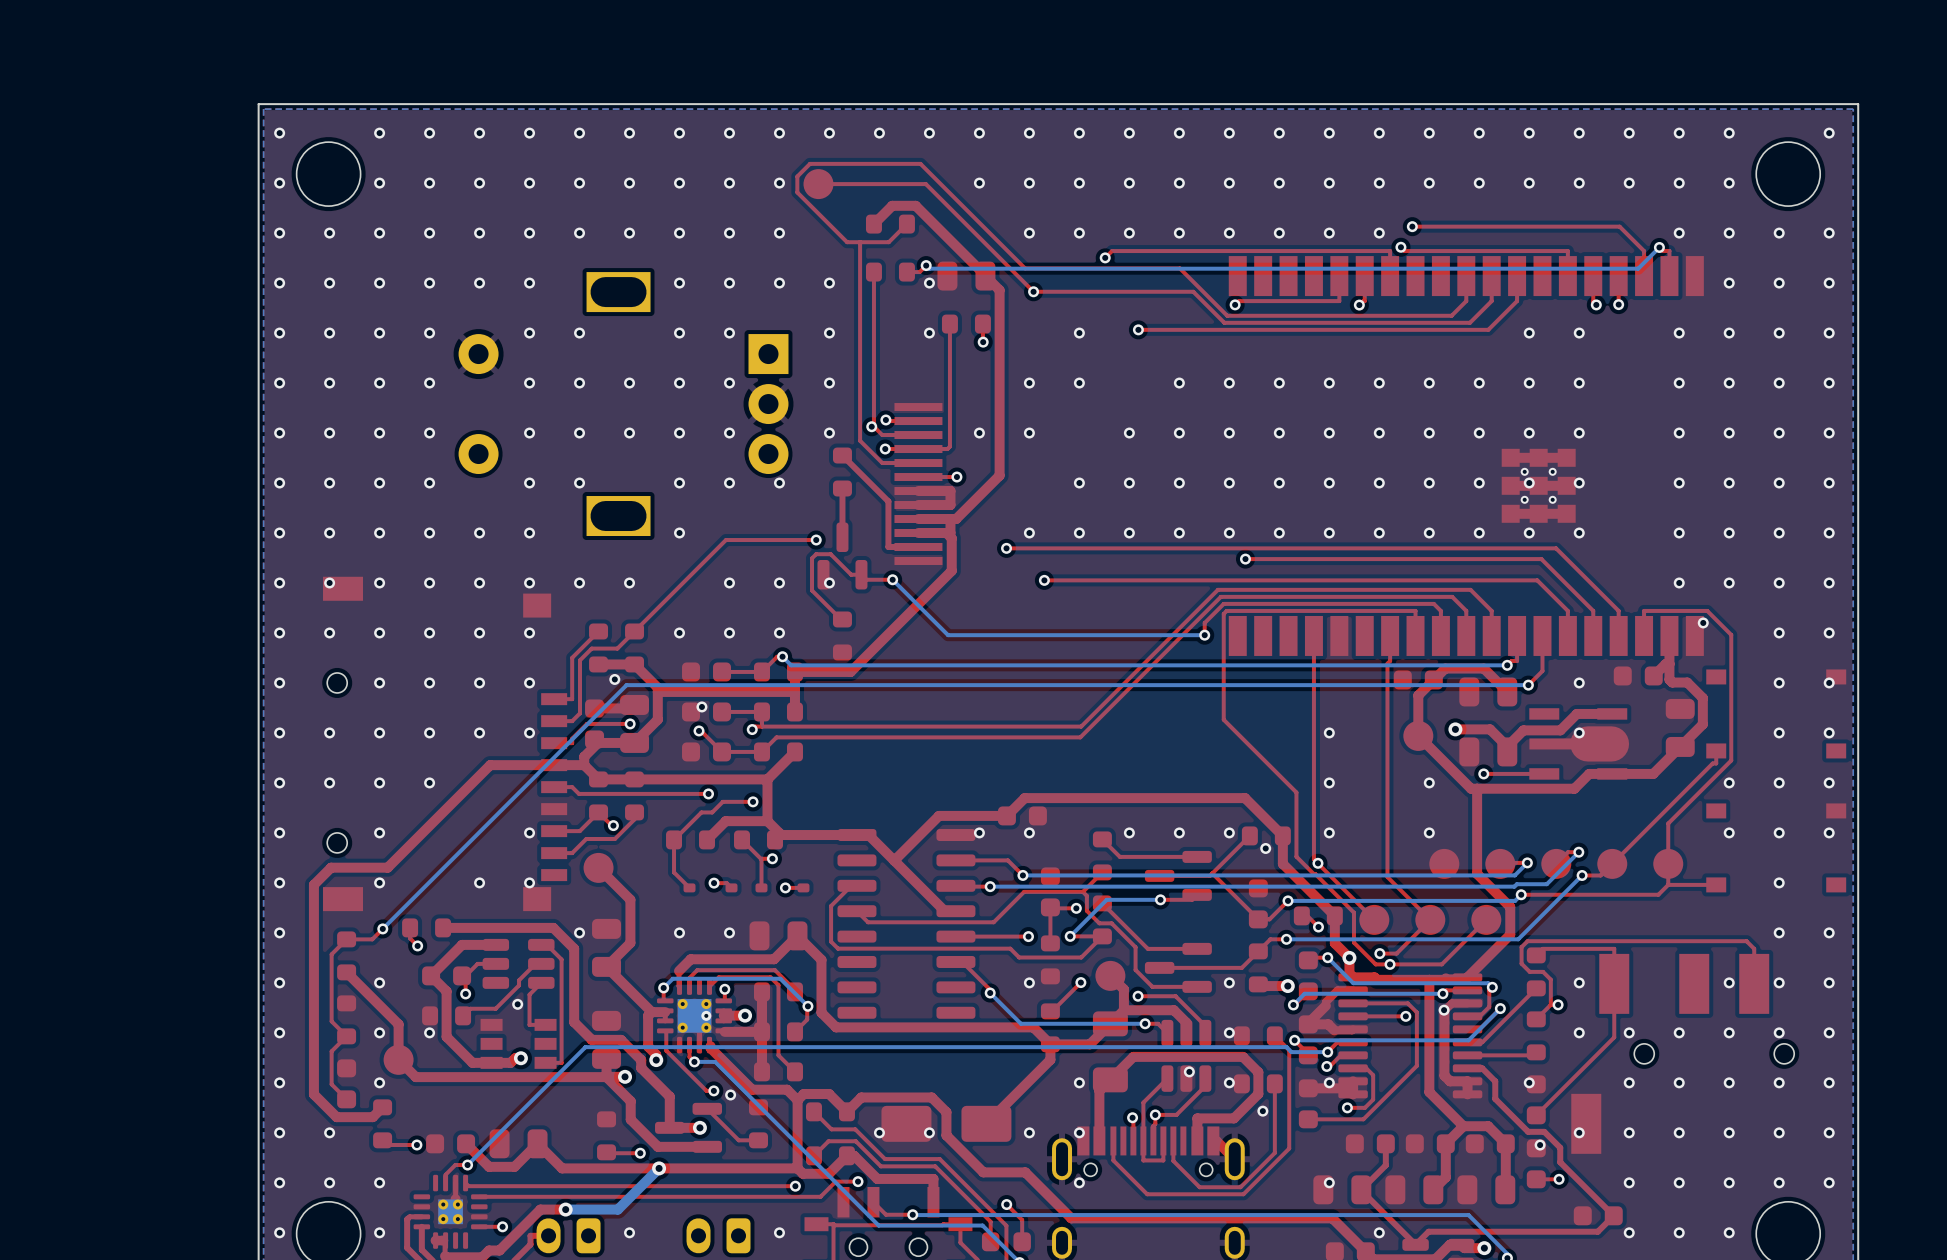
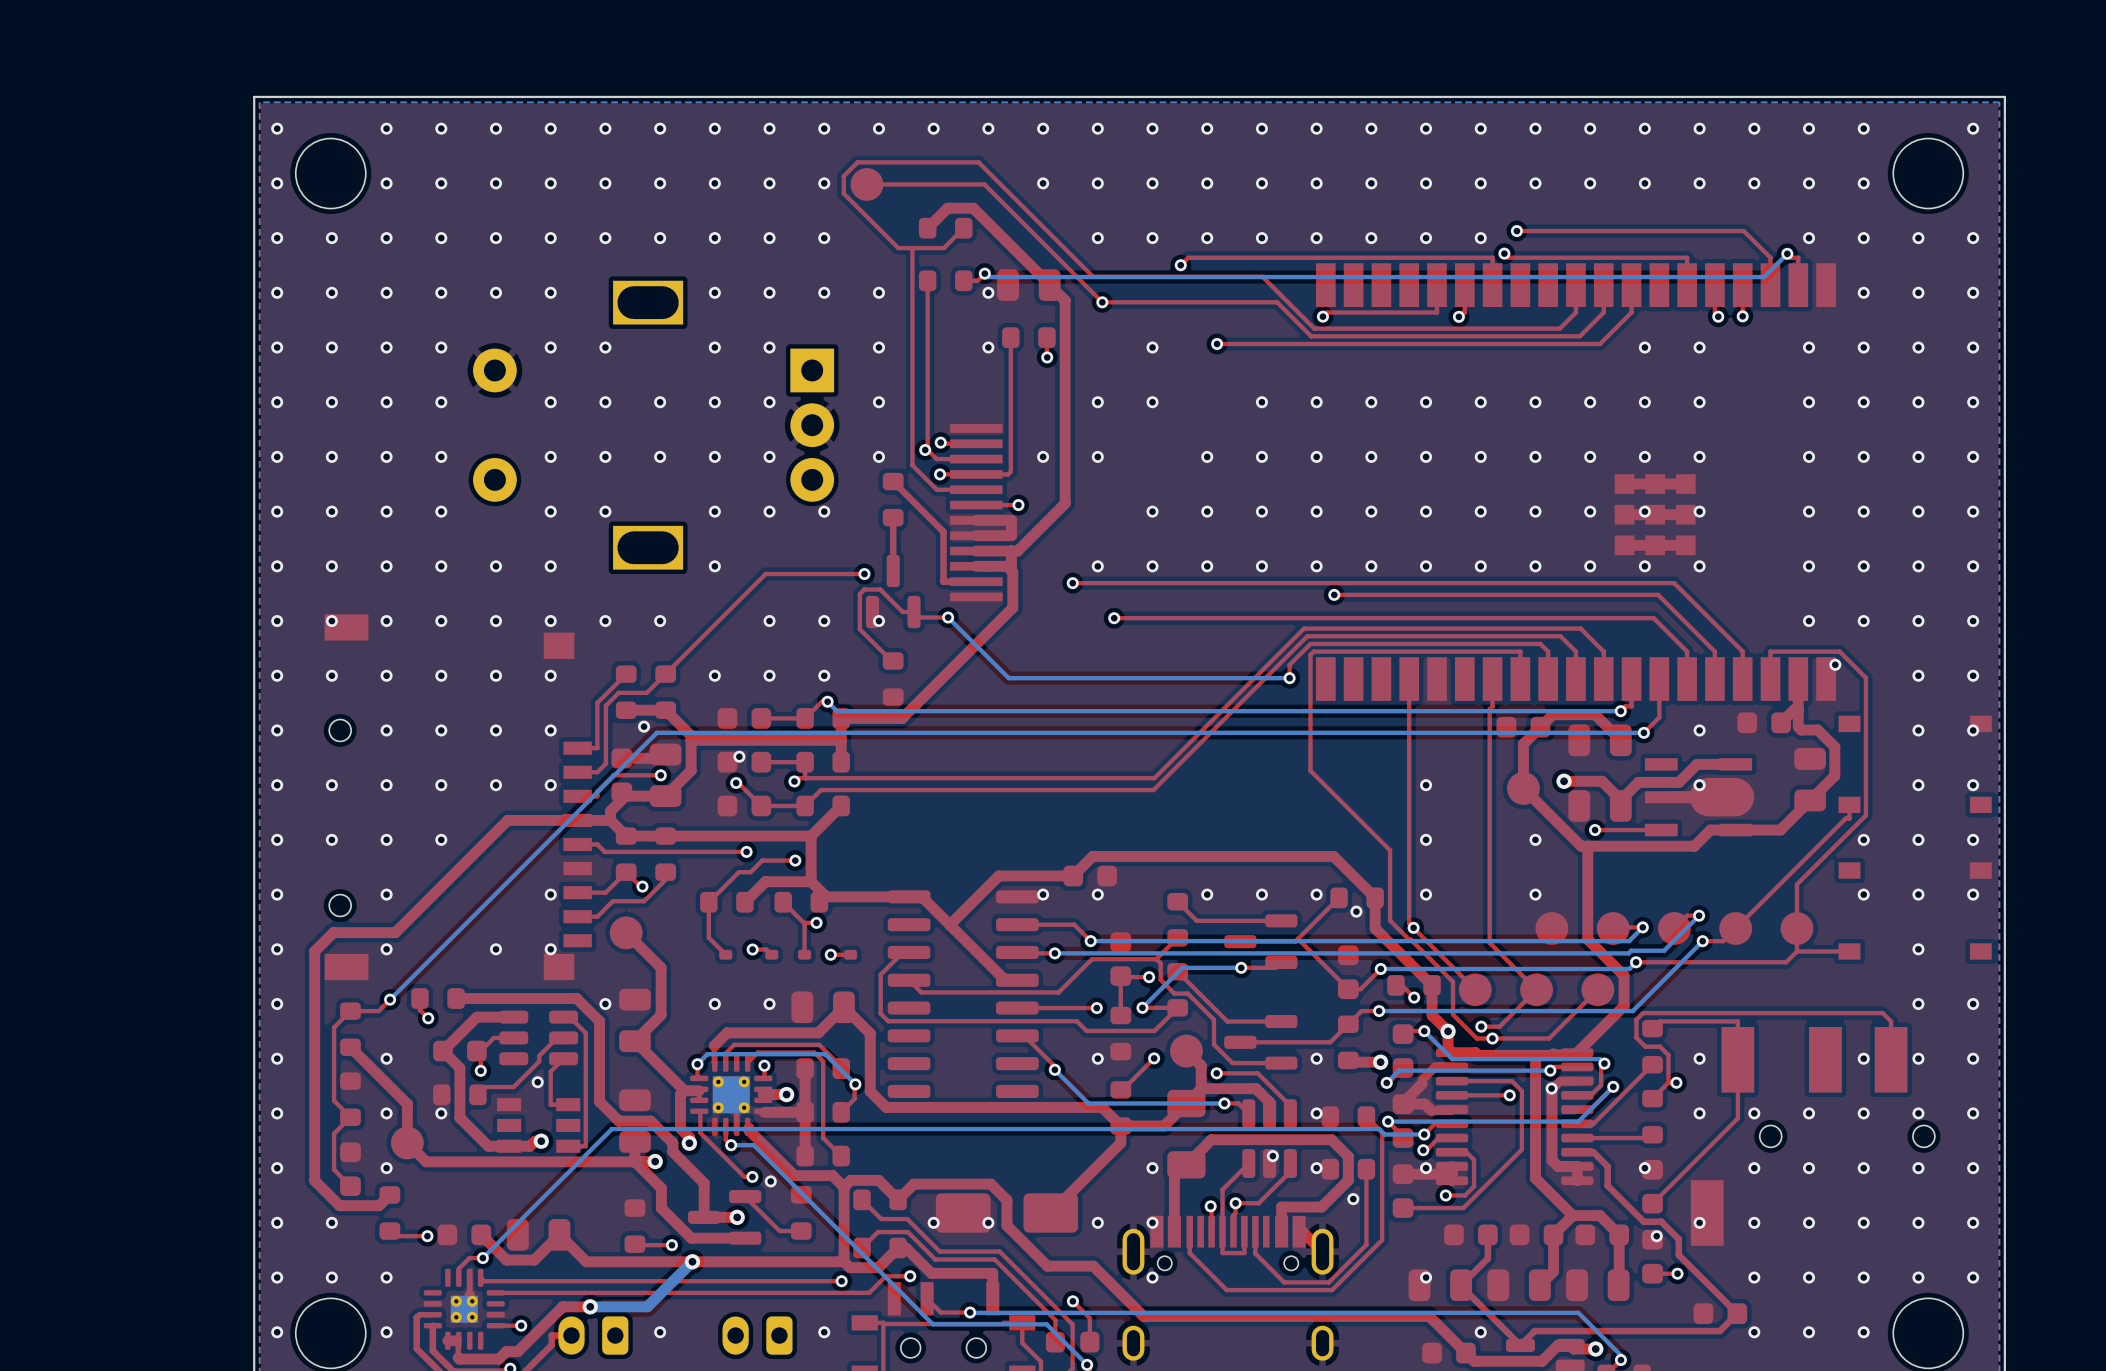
via: (1524, 471) -> none
via: (1552, 471) -> none
via: (1524, 499) -> none
via: (1552, 499) -> none
via: (706, 1015) -> none

